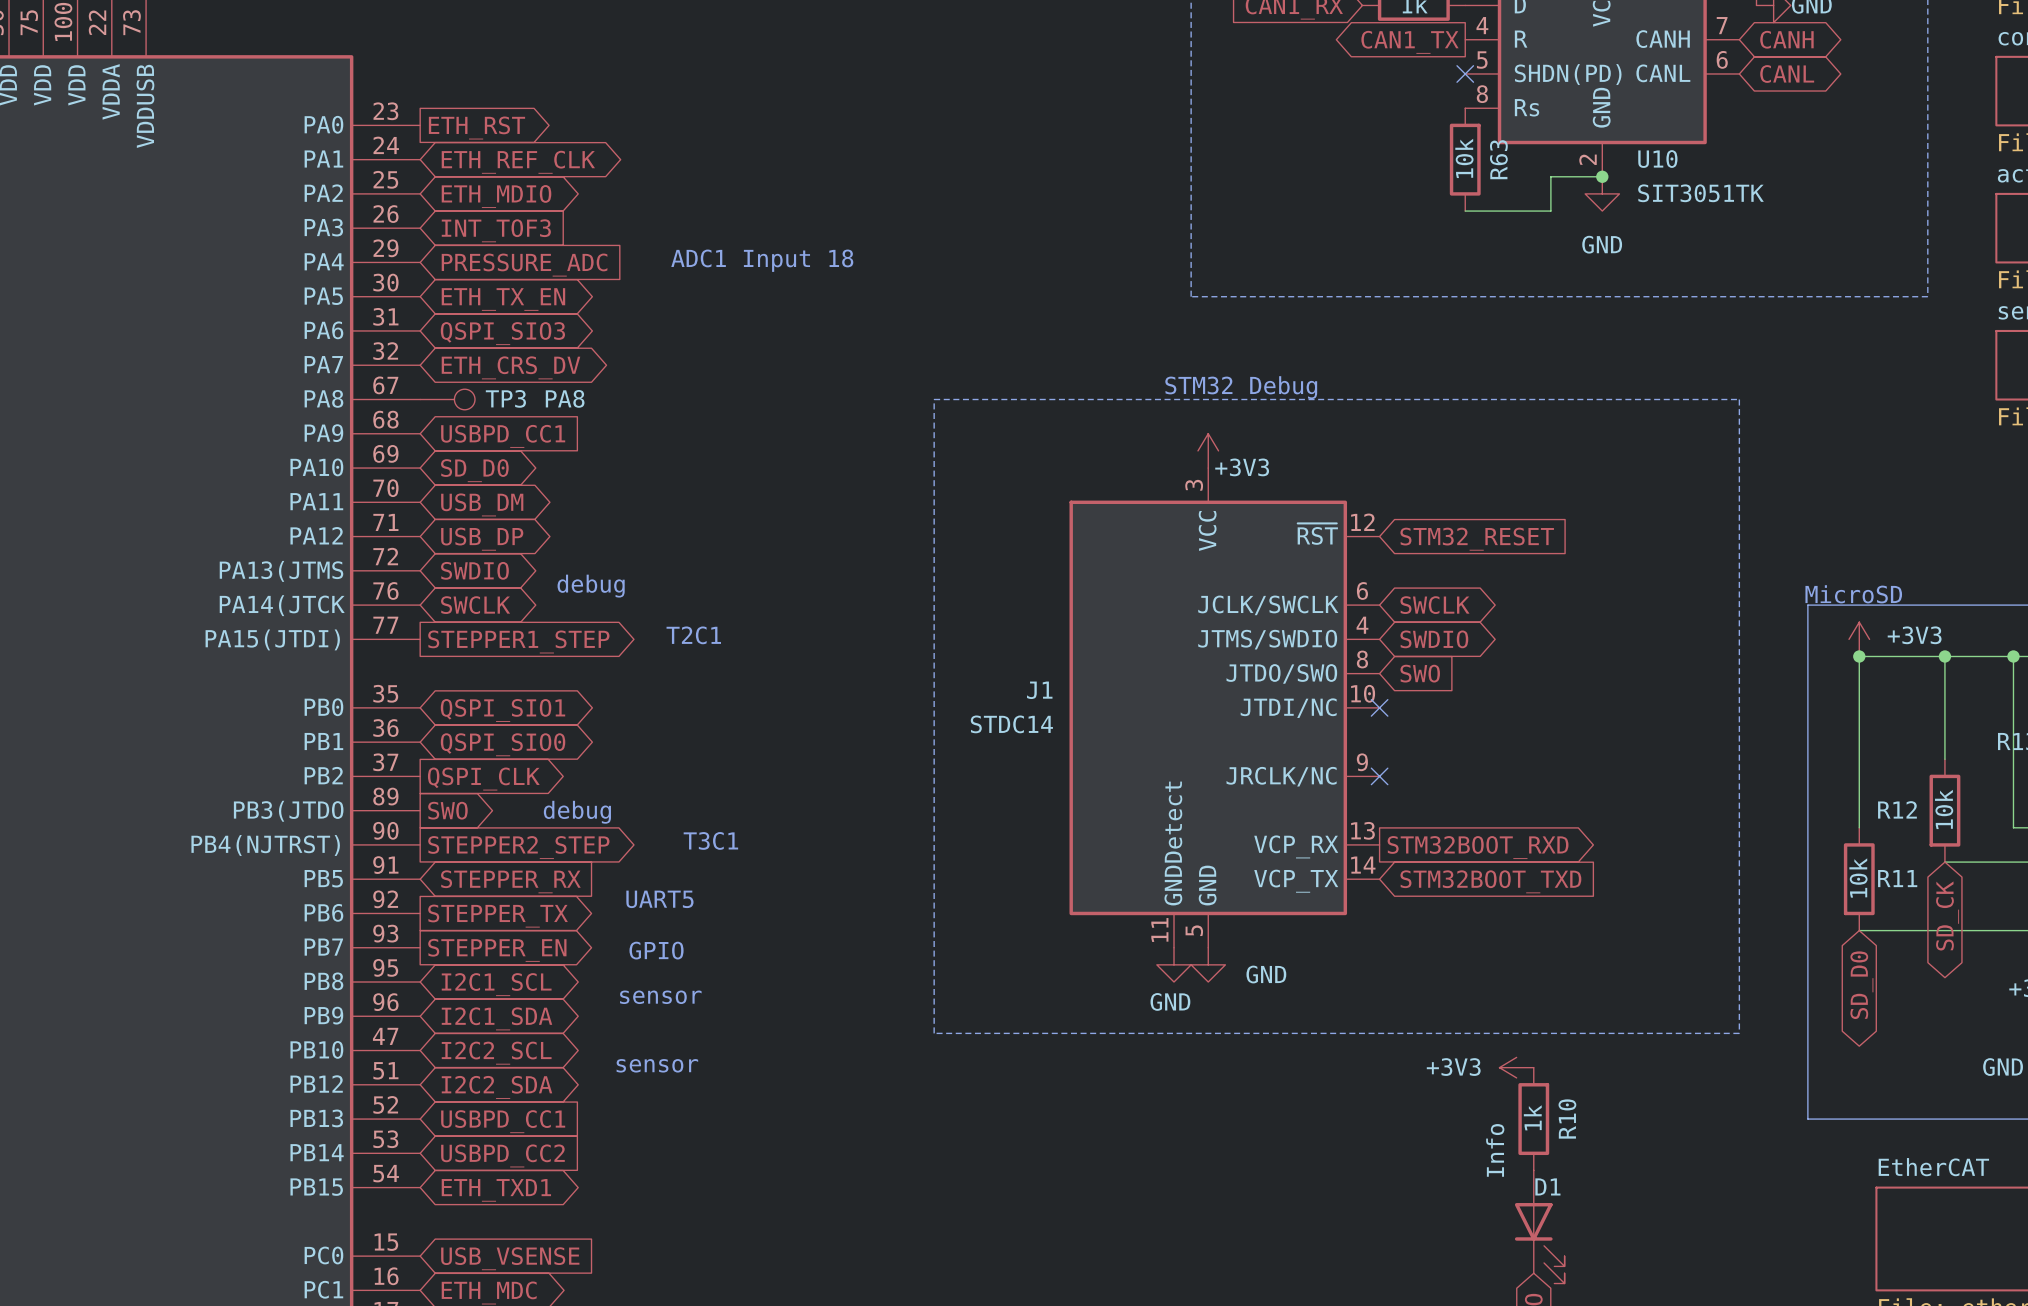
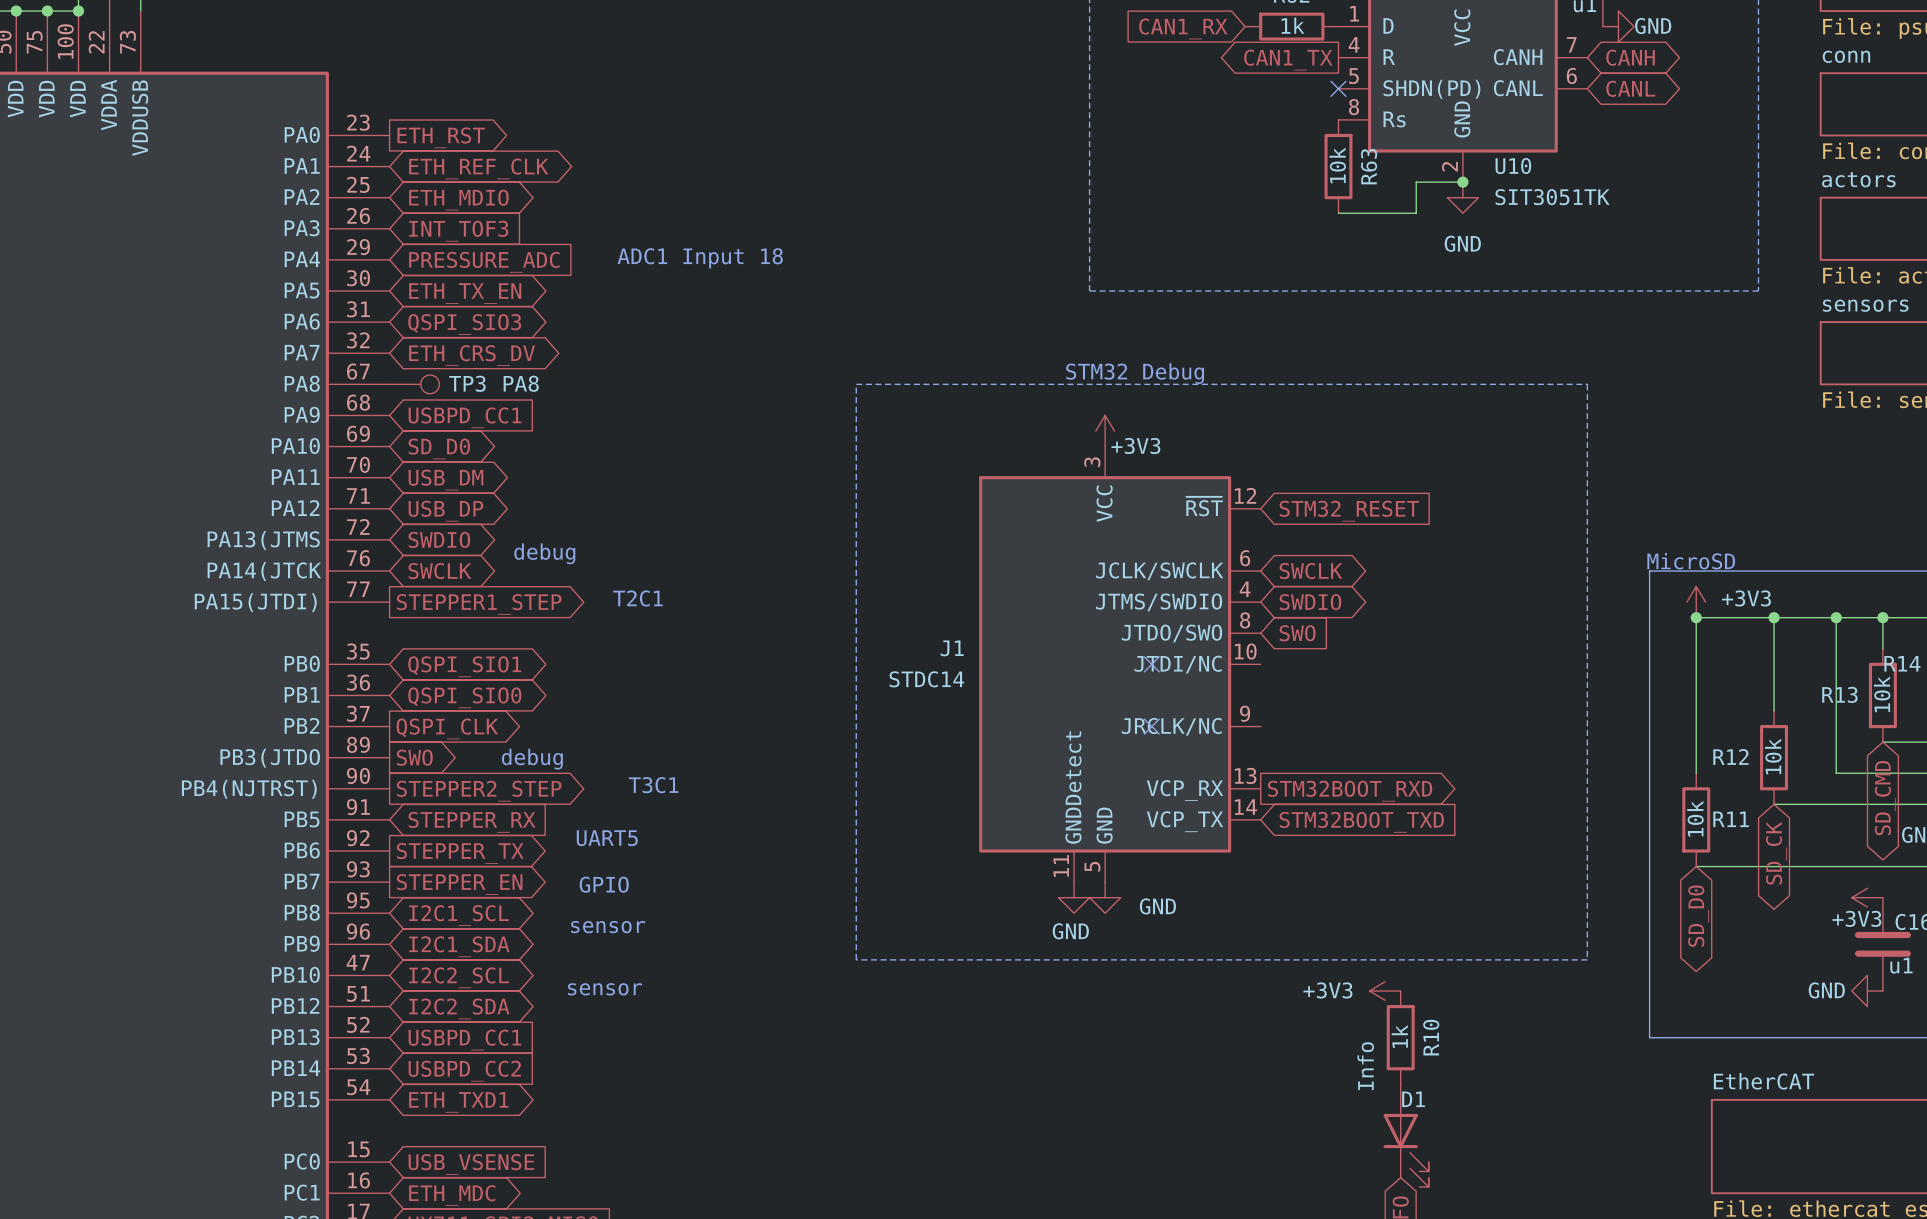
no-connect mark: none -> (1151, 664)
no-connect mark: (1379, 707) -> none
no-connect mark: none -> (1151, 726)
no-connect mark: (1379, 776) -> none

